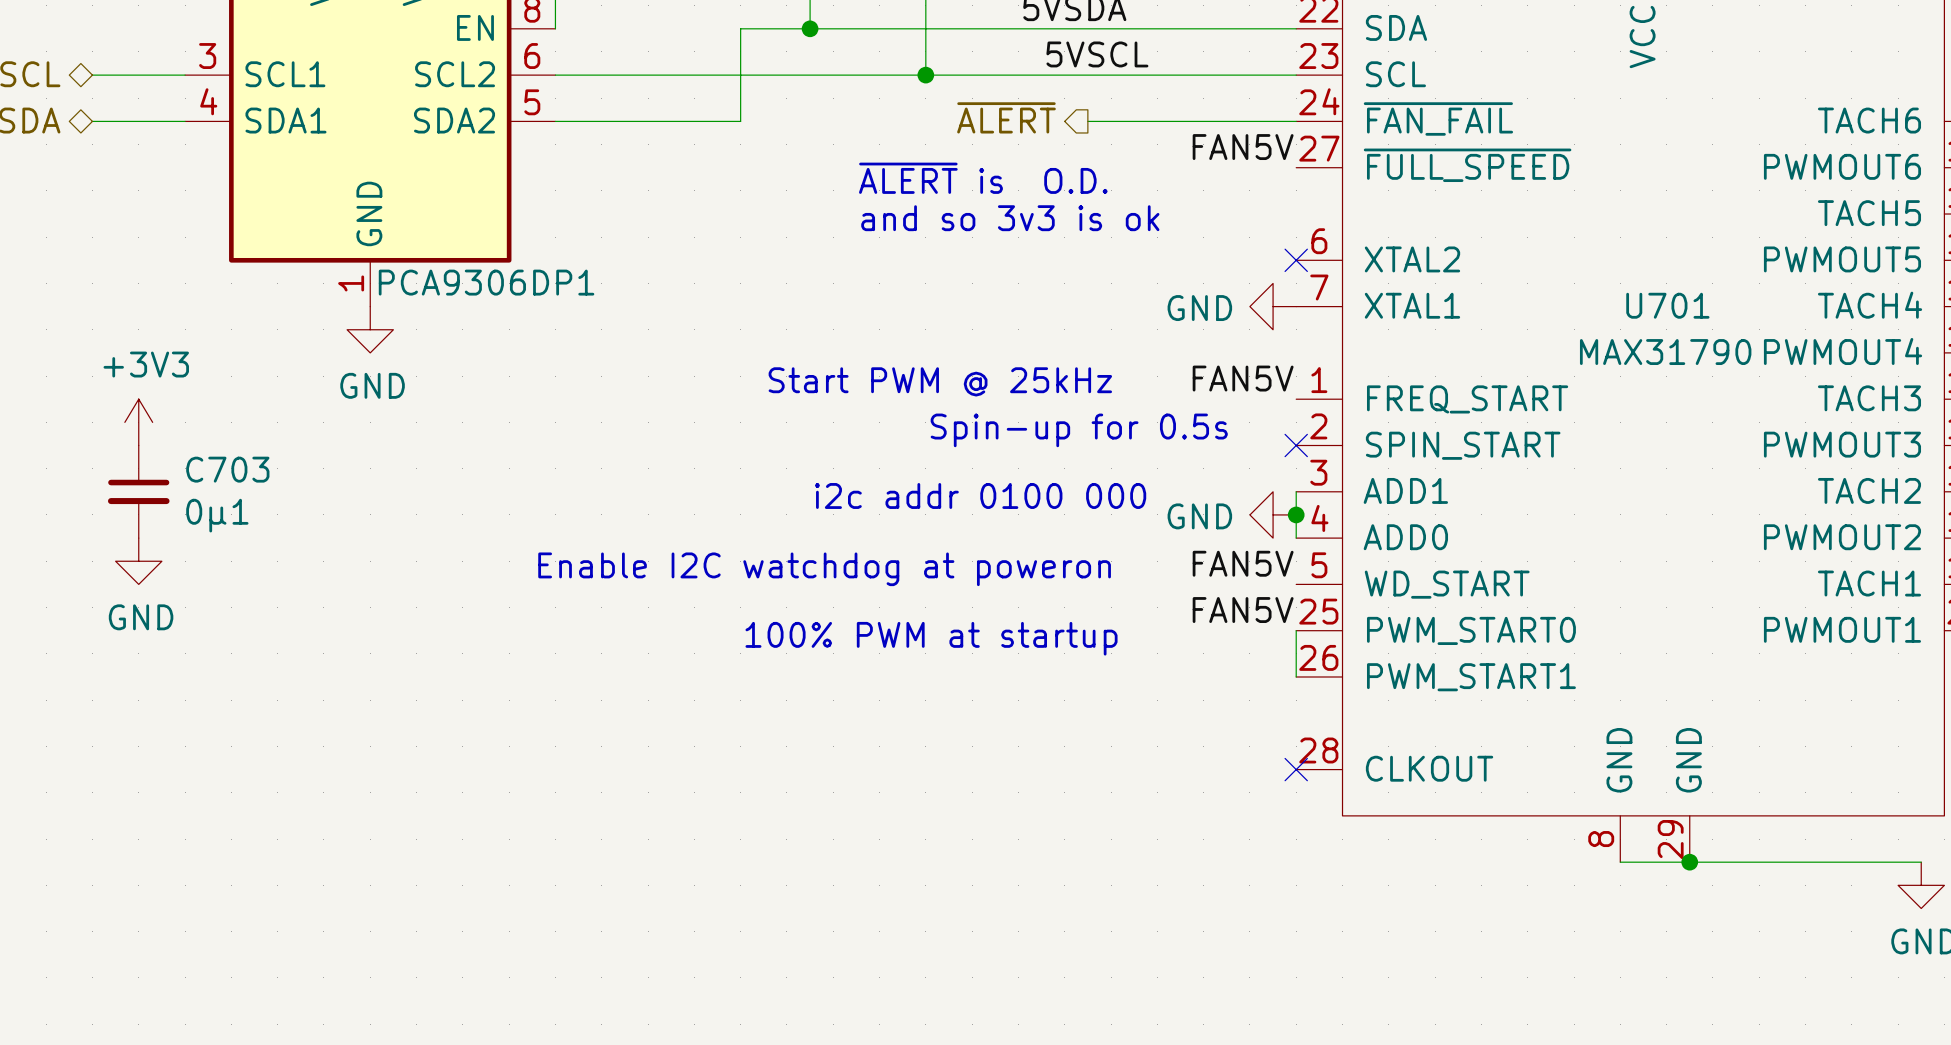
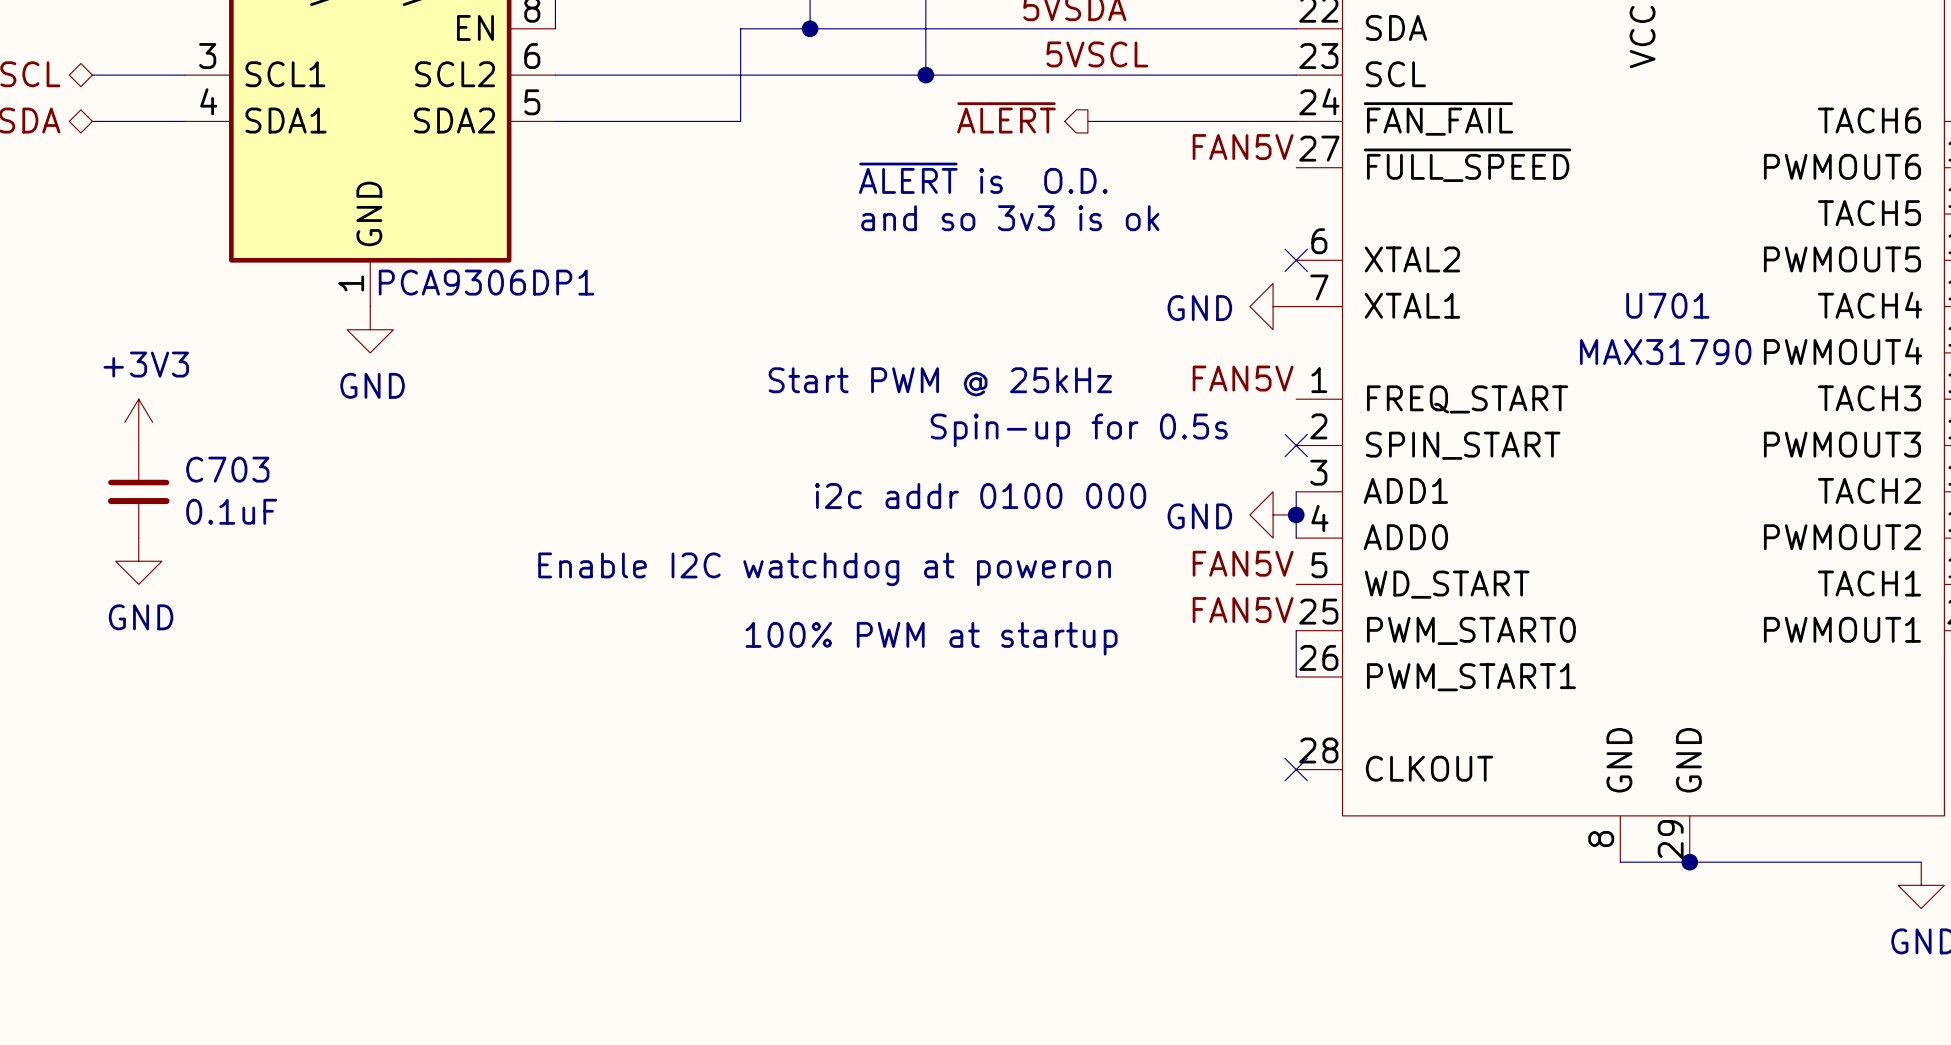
C703 value: 0µ1 (217, 515) -> 0.1uF (231, 511)

